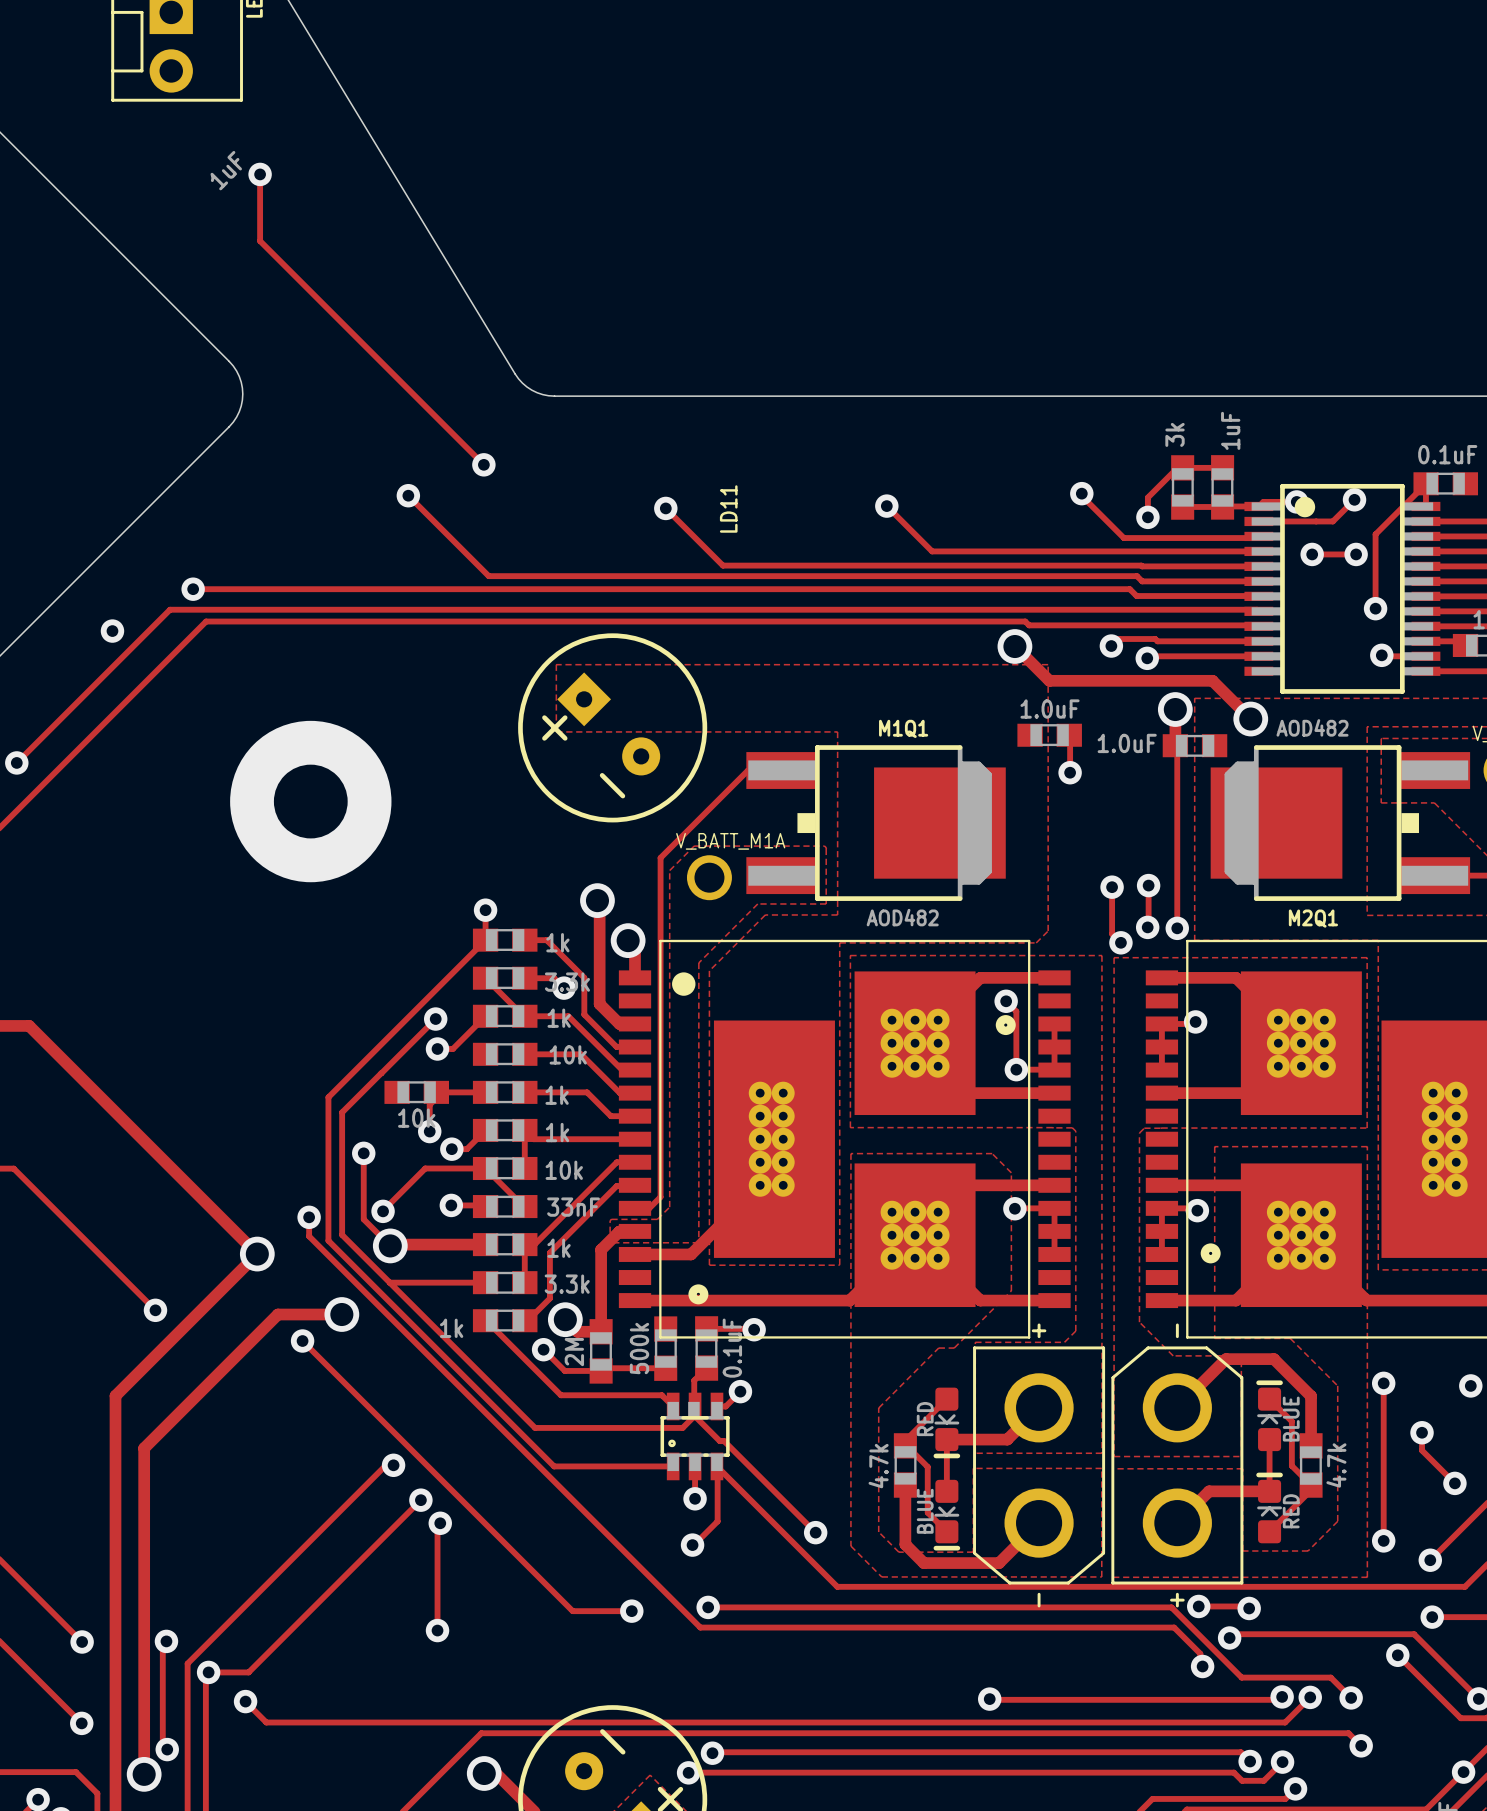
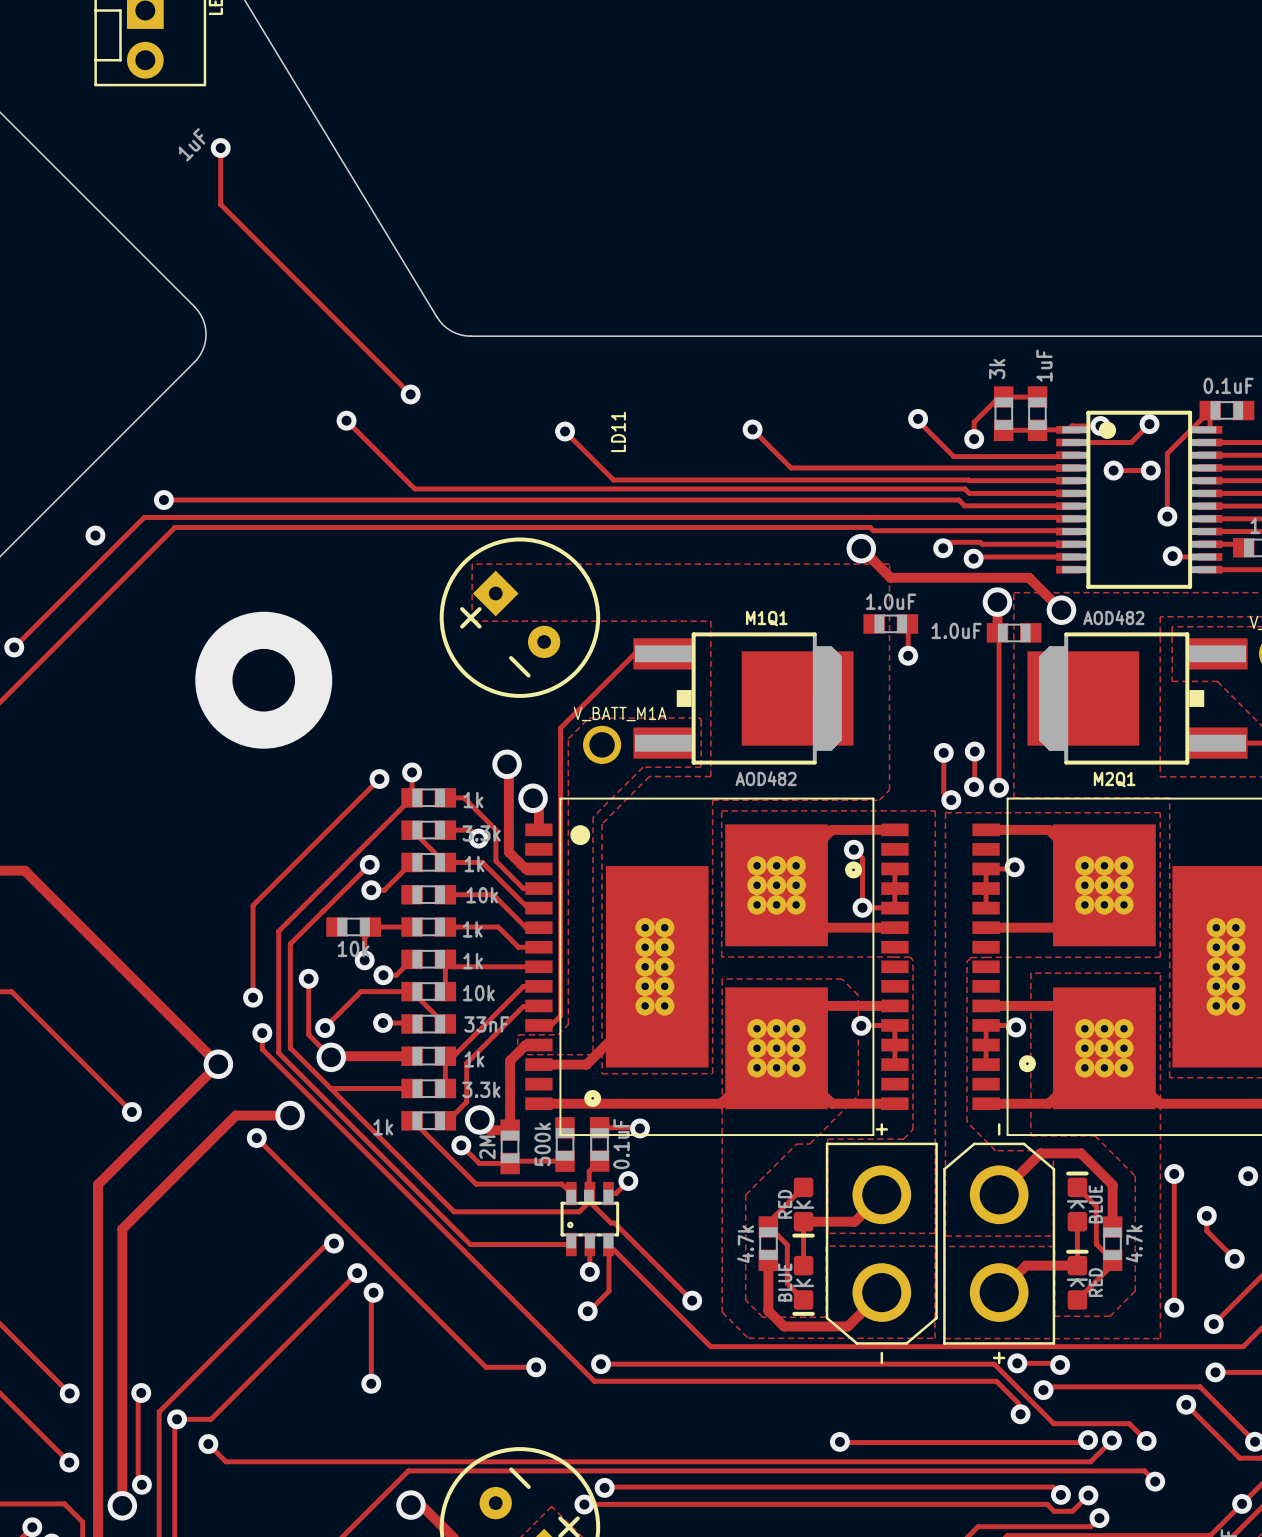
track: none -> (379, 779) (253, 905) (253, 997)
via: none -> (379, 779)
via: none -> (253, 997)

